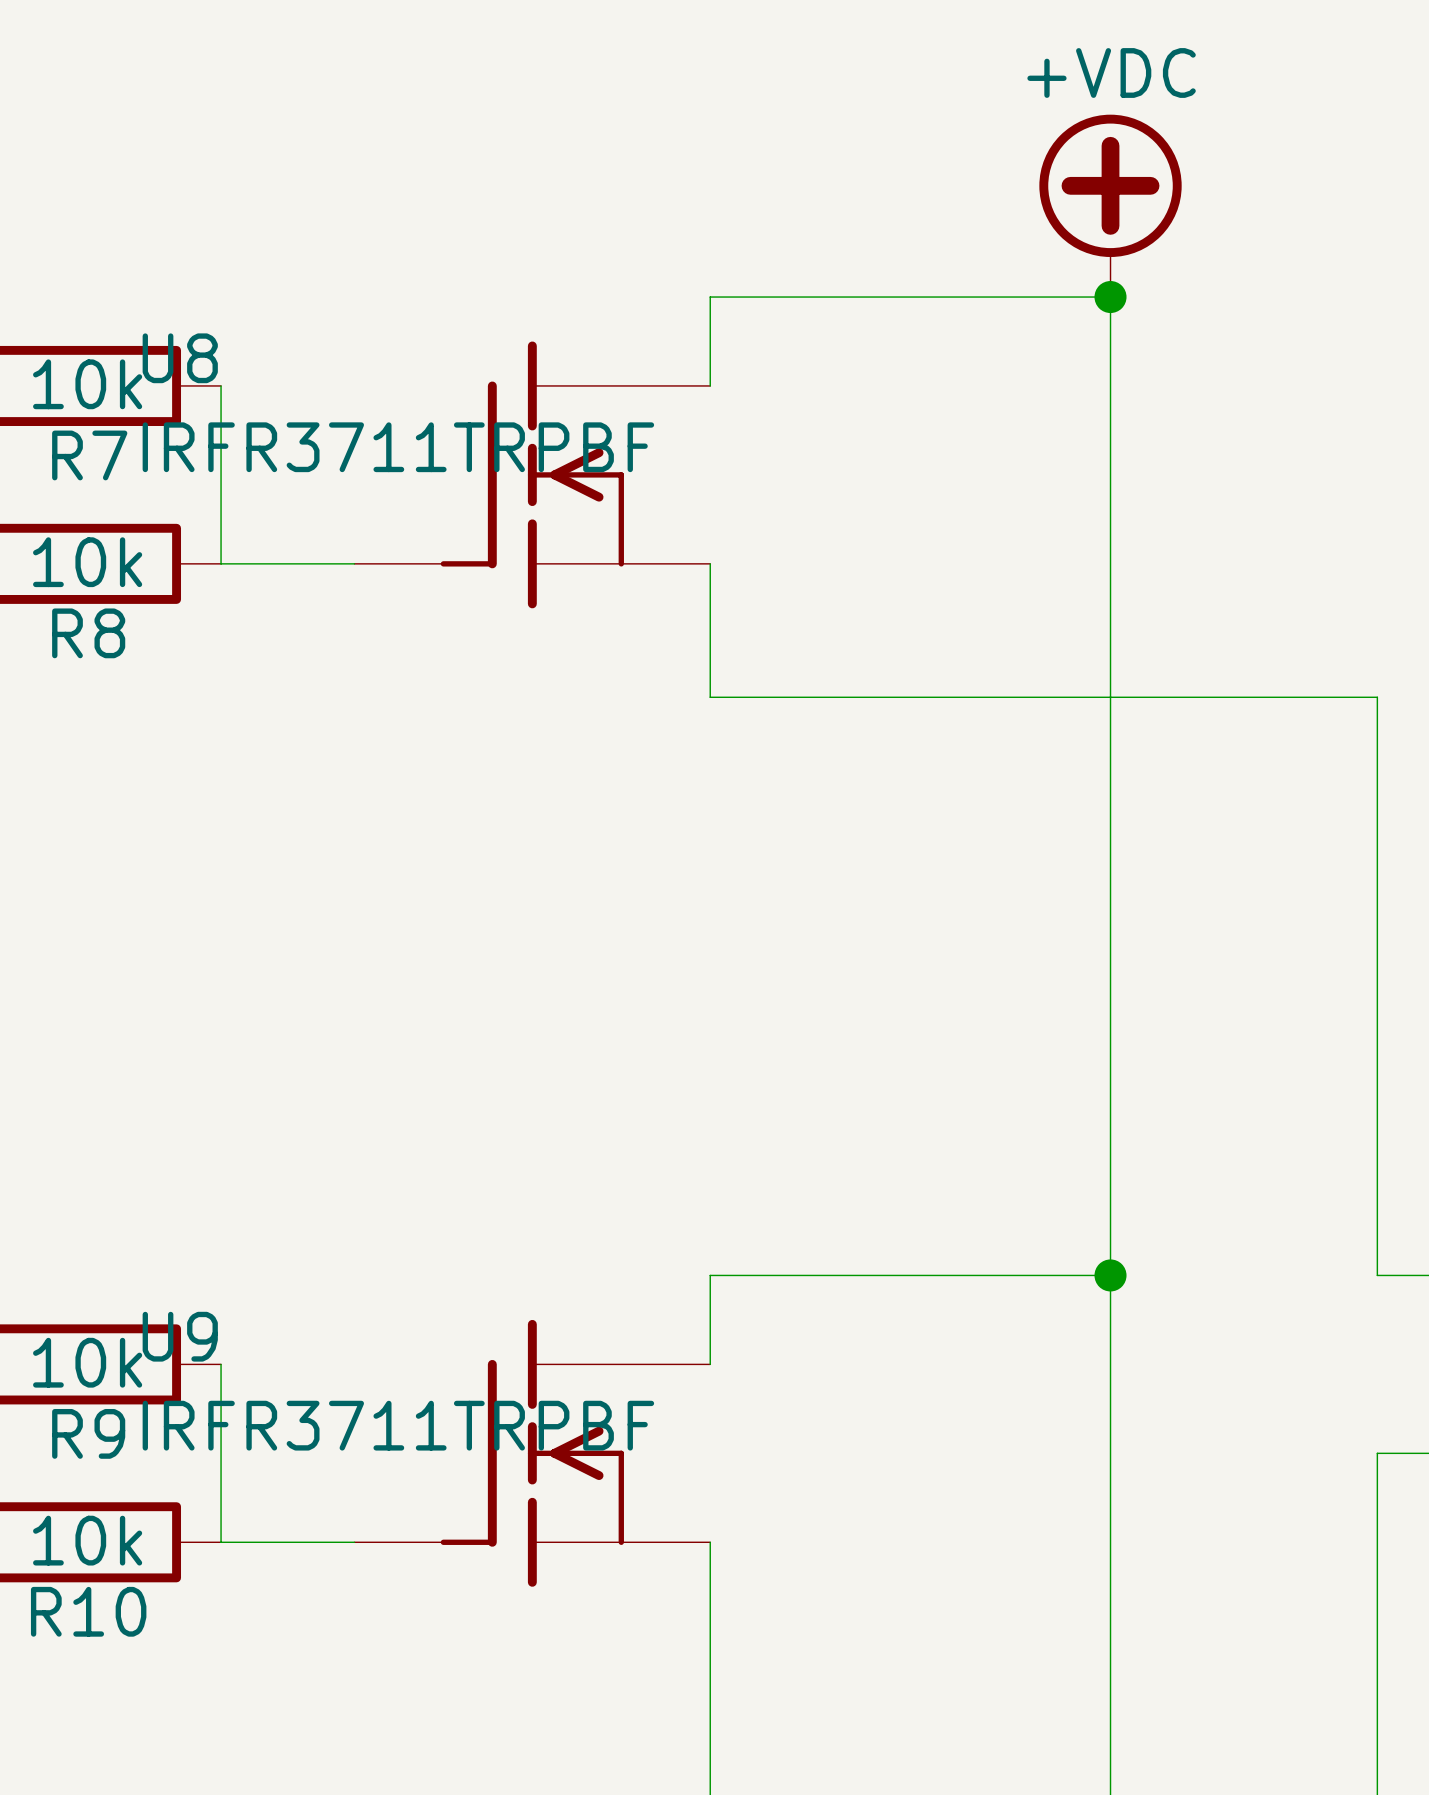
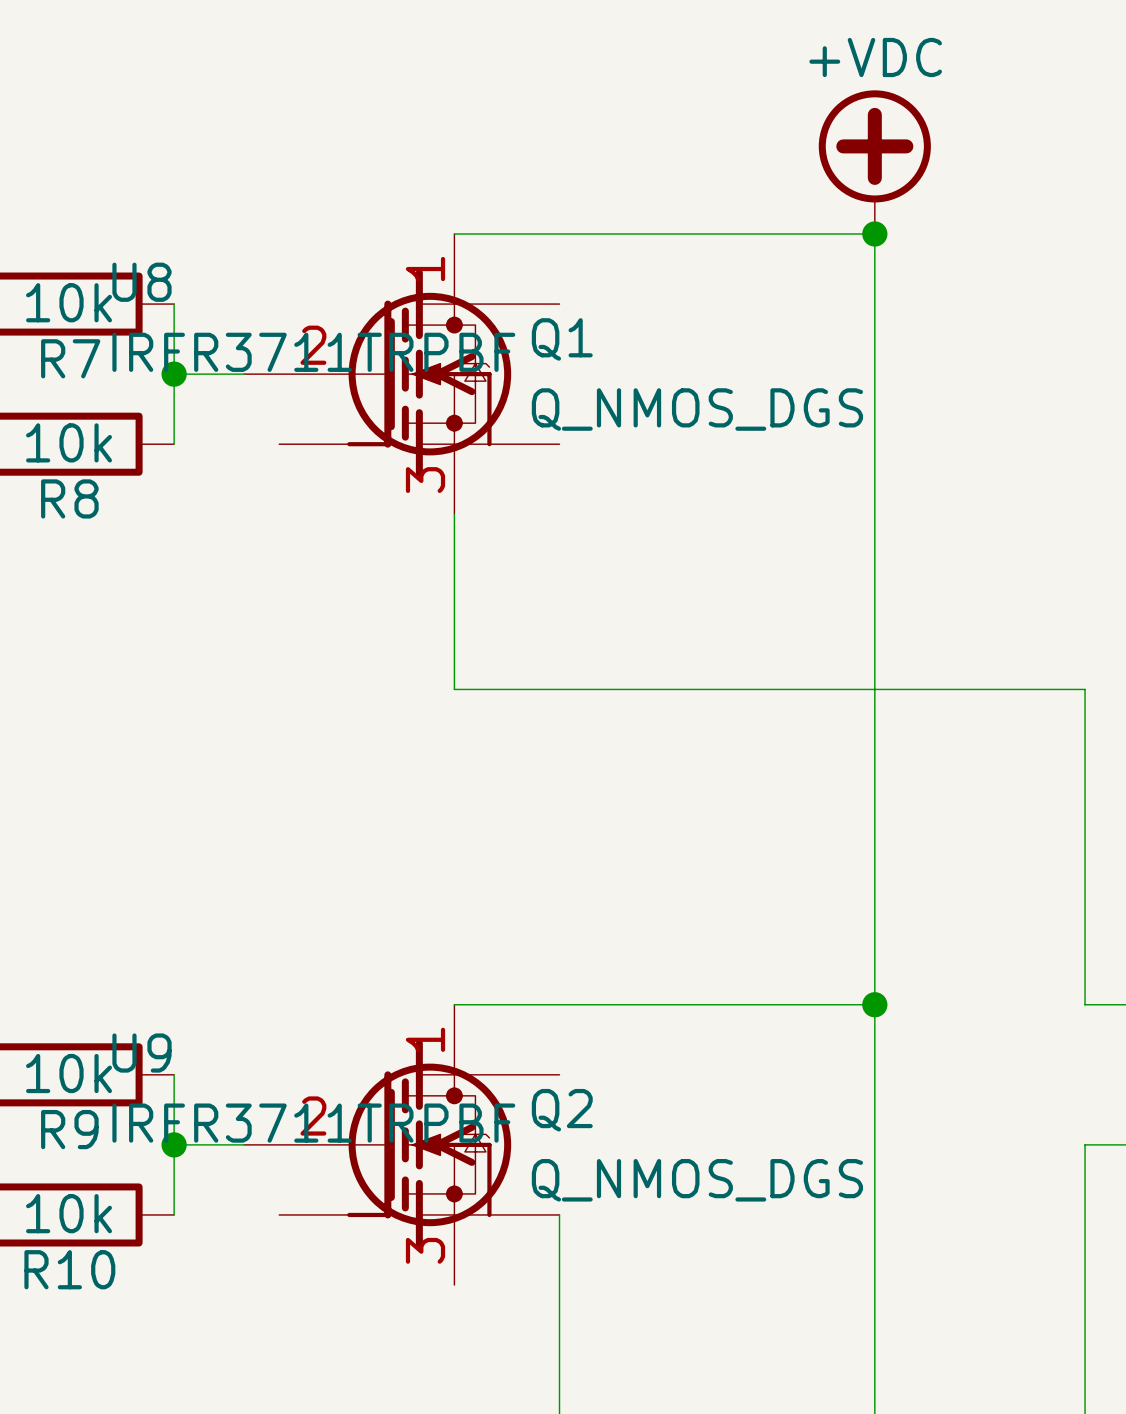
wire: (710, 297) (710, 385) -> (559, 233) (454, 233)
wire: none -> (174, 374) (244, 374)
junction: none -> (174, 374)
Q1: none -> Q_NMOS_DGS (377, 374)
wire: (221, 563) (354, 563) -> none
wire: (710, 563) (710, 697) (1377, 697) (1377, 875) -> (454, 514) (454, 689) (1085, 689)
wire: (710, 1275) (710, 1364) -> (559, 1004) (454, 1004)
wire: none -> (174, 1144) (244, 1144)
junction: none -> (174, 1144)
Q2: none -> Q_NMOS_DGS (377, 1144)
wire: (221, 1542) (354, 1542) -> none

